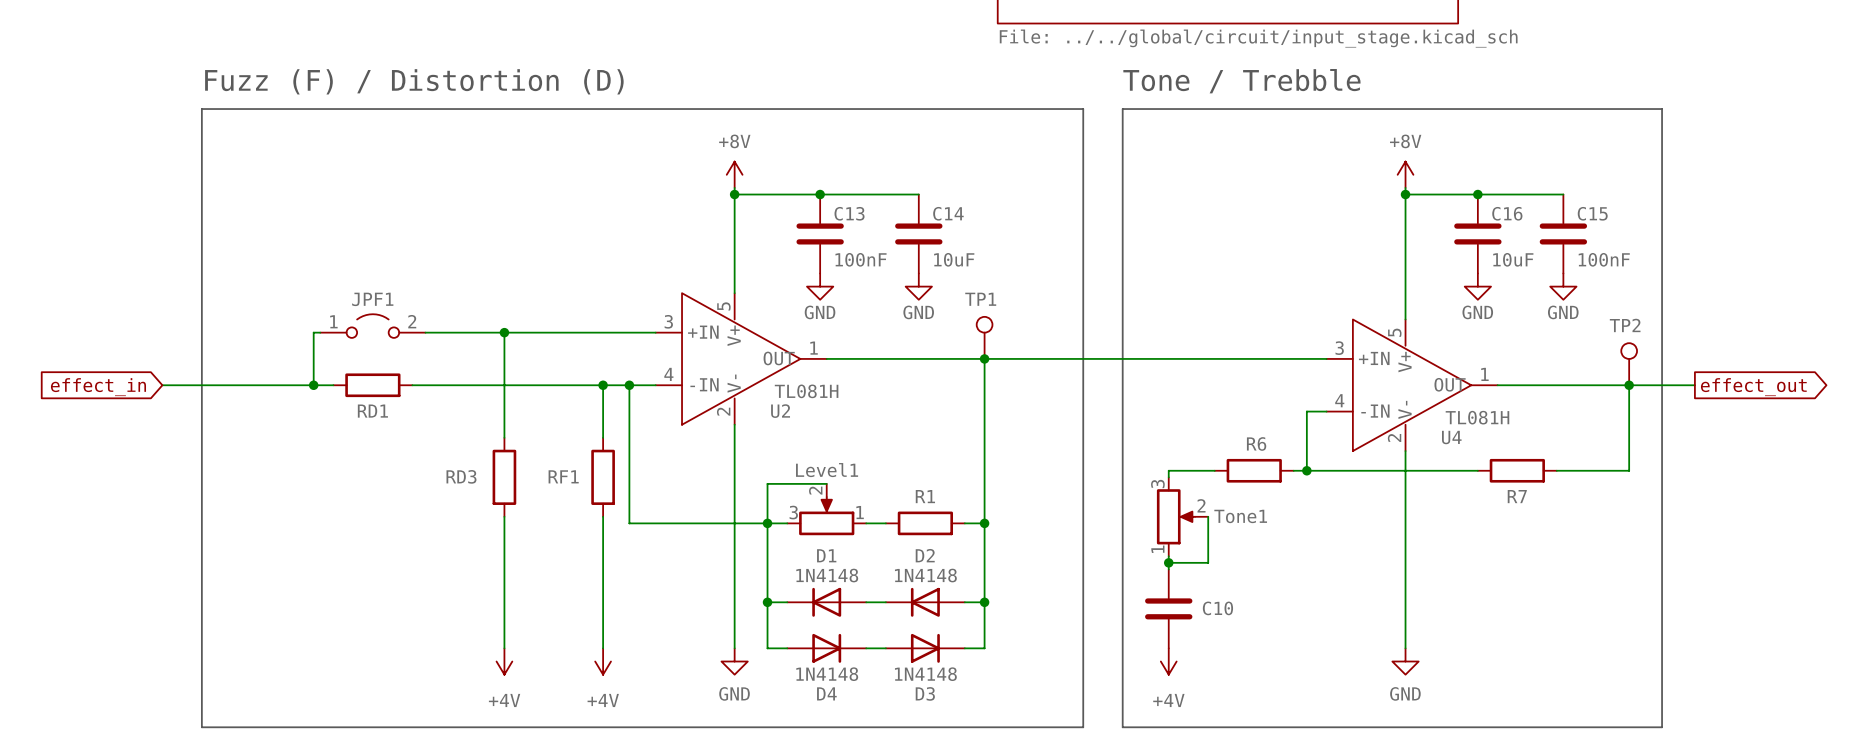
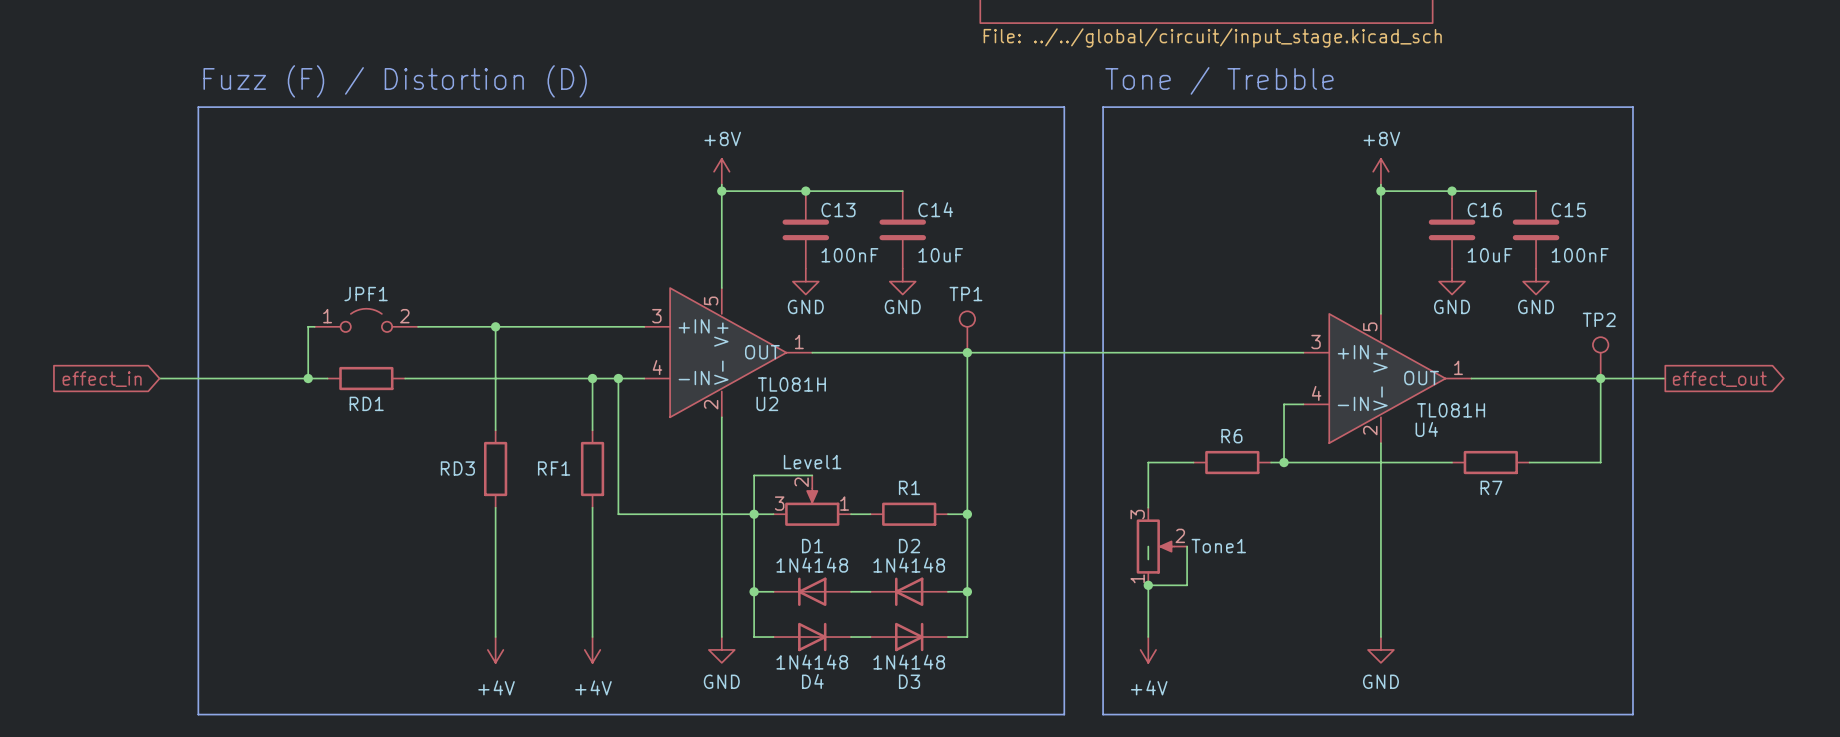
Tone1 position: (1182, 516) -> (1161, 546)
wire: (1208, 516) (1208, 556) -> (1148, 469) (1148, 507)
wire: (1168, 562) (1208, 562) -> (1148, 637) (1148, 585) (1187, 585) (1187, 553)
junction position: (1168, 562) -> (1148, 585)
C10: (1168, 608) -> none

